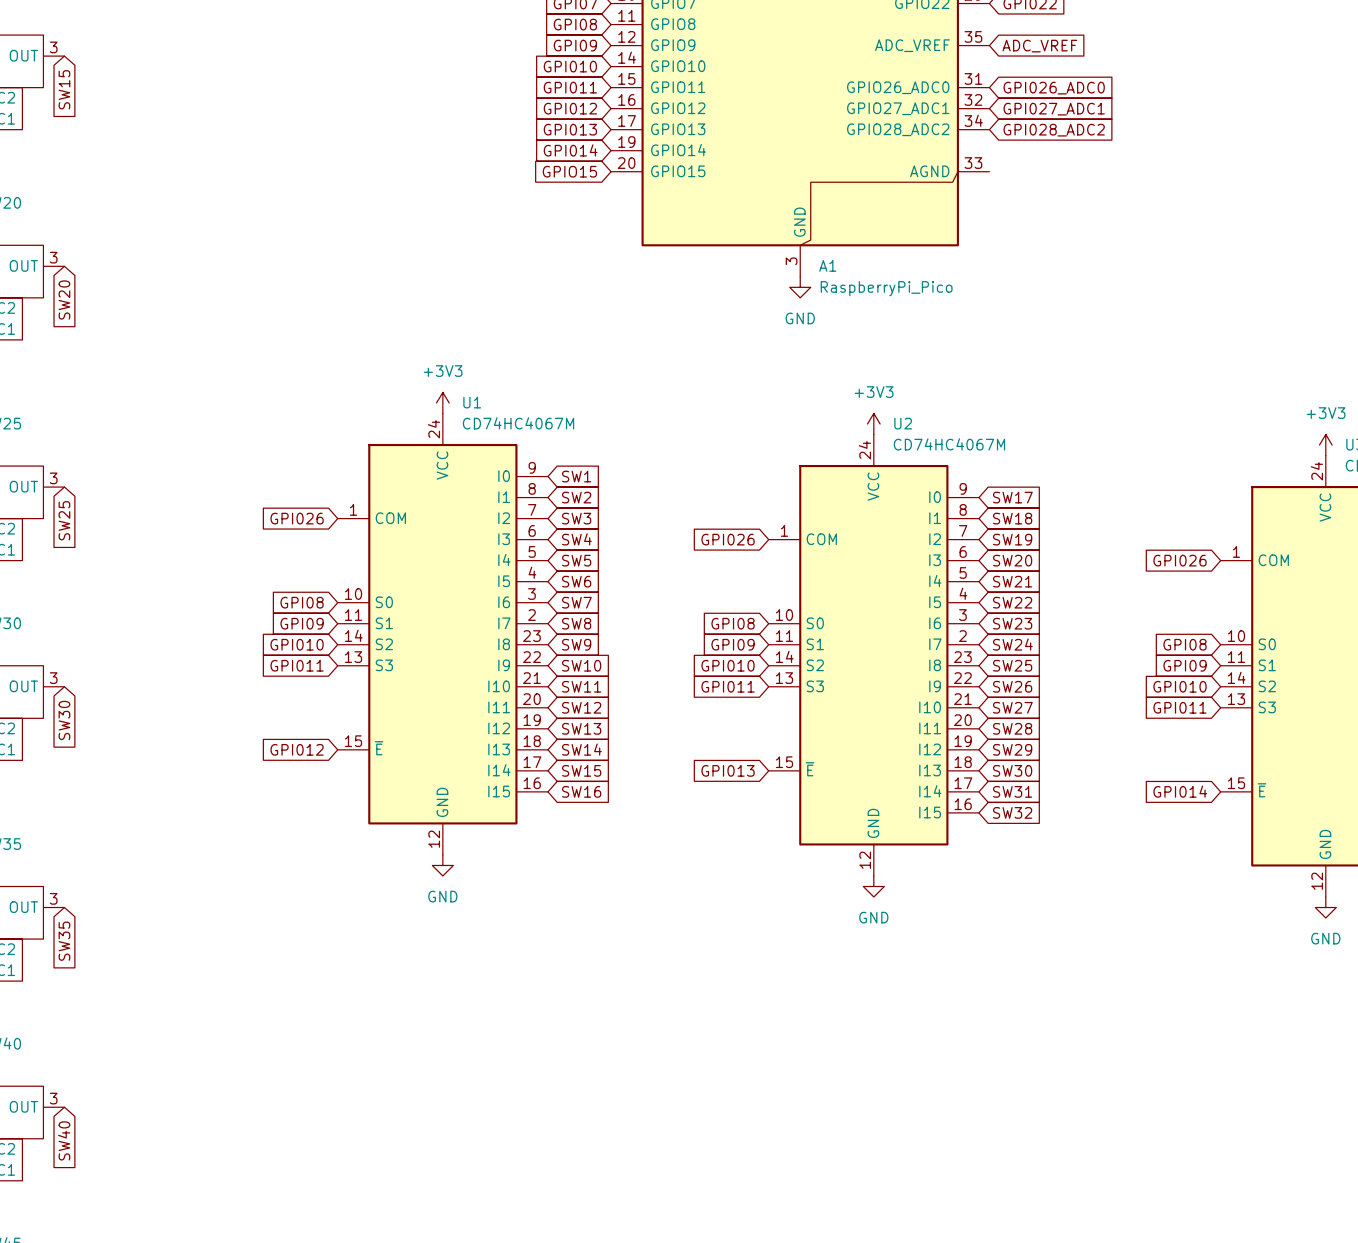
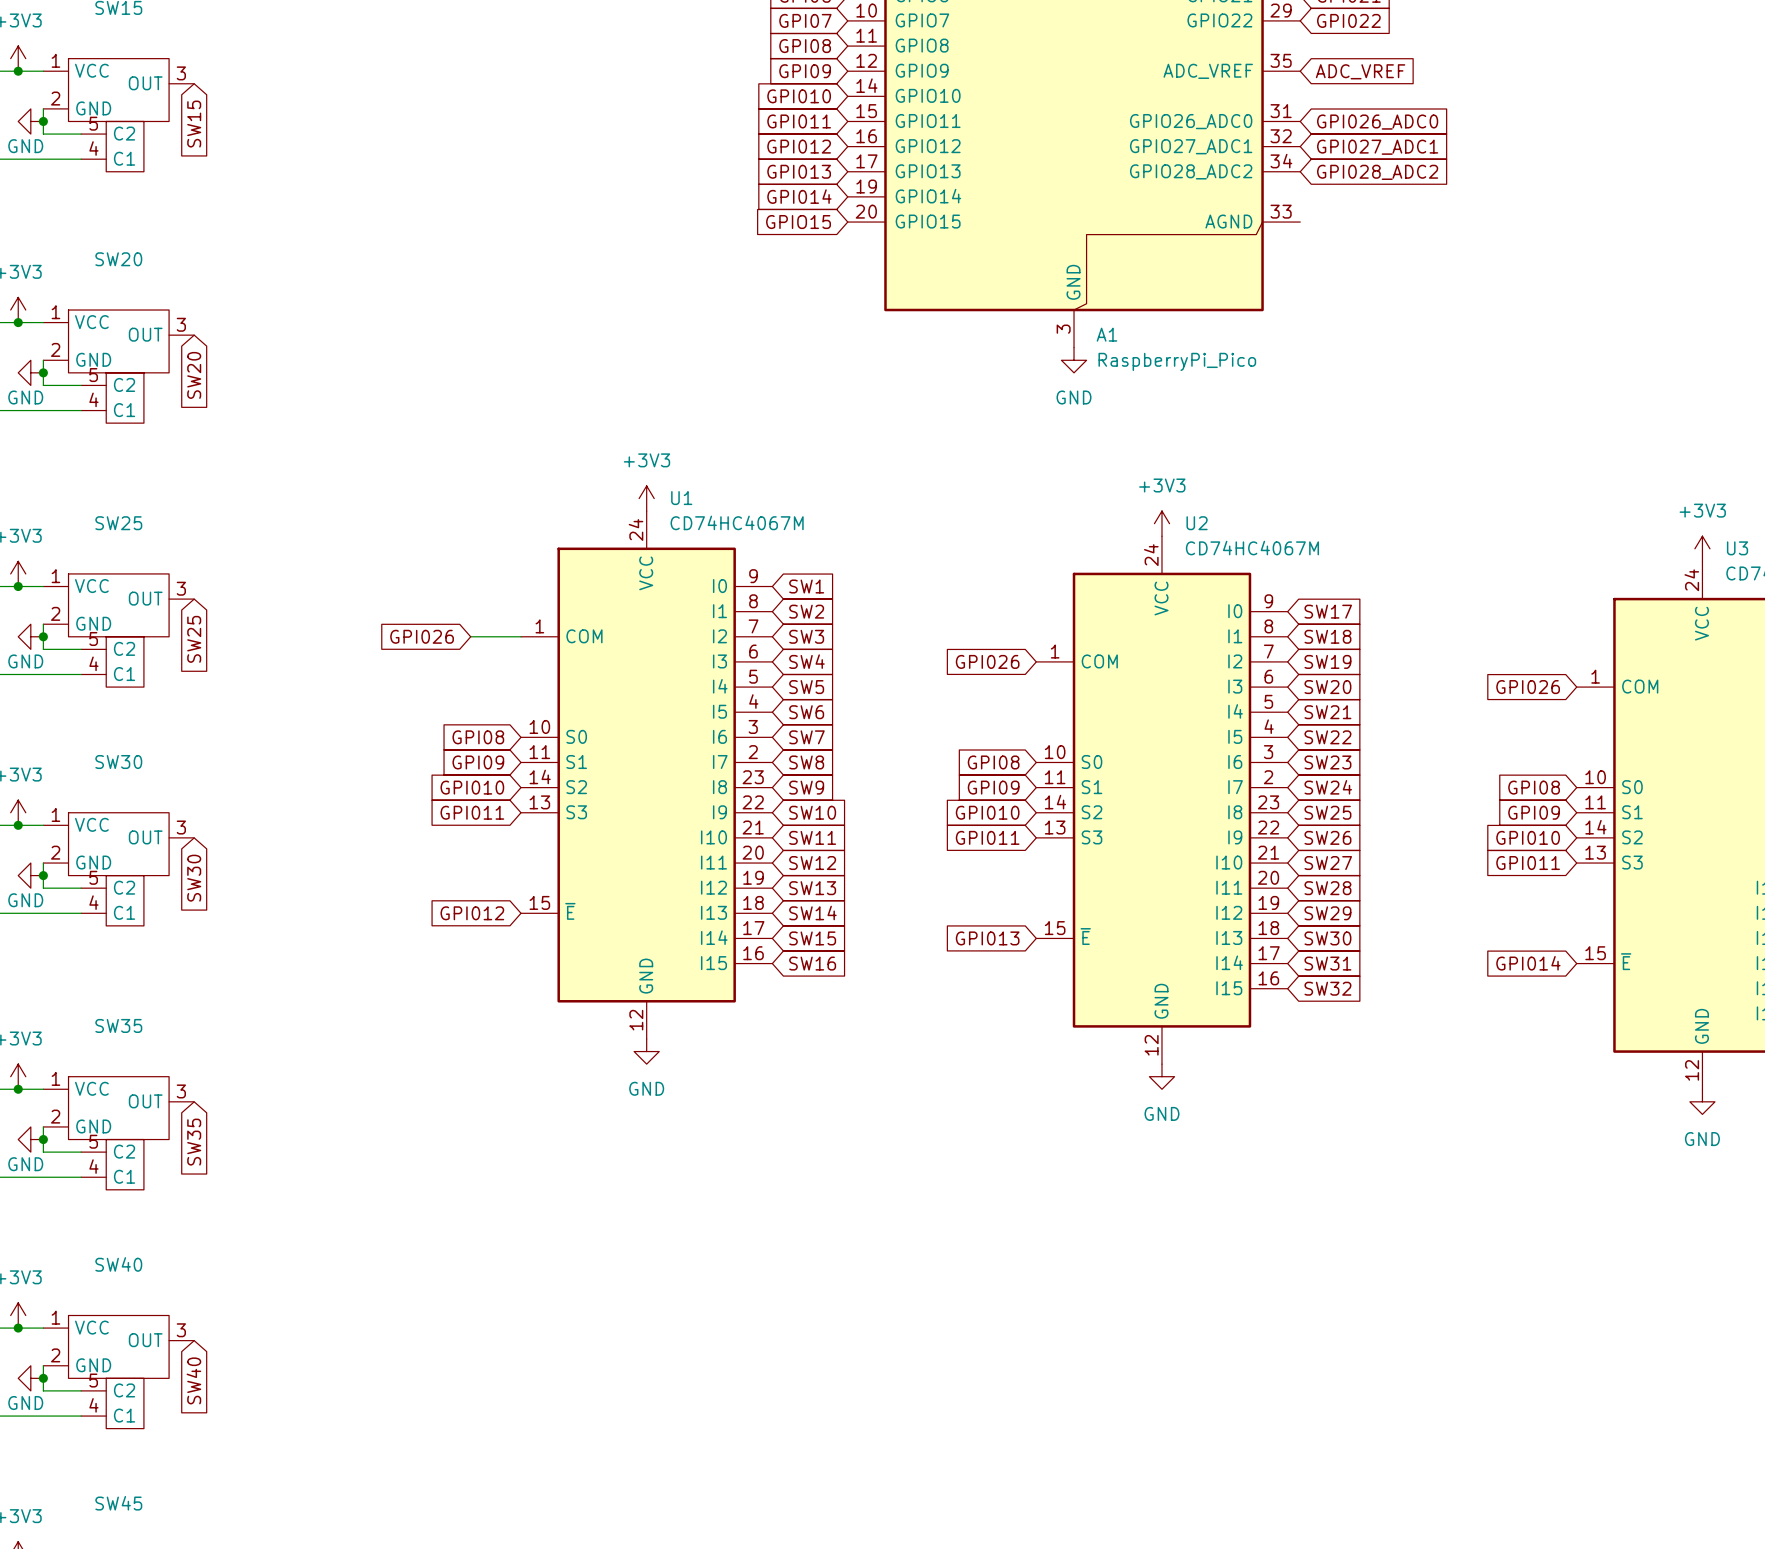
wire: none -> (470, 636) (520, 636)
global label position: GPI026 (297, 518) -> GPI026 (422, 636)

